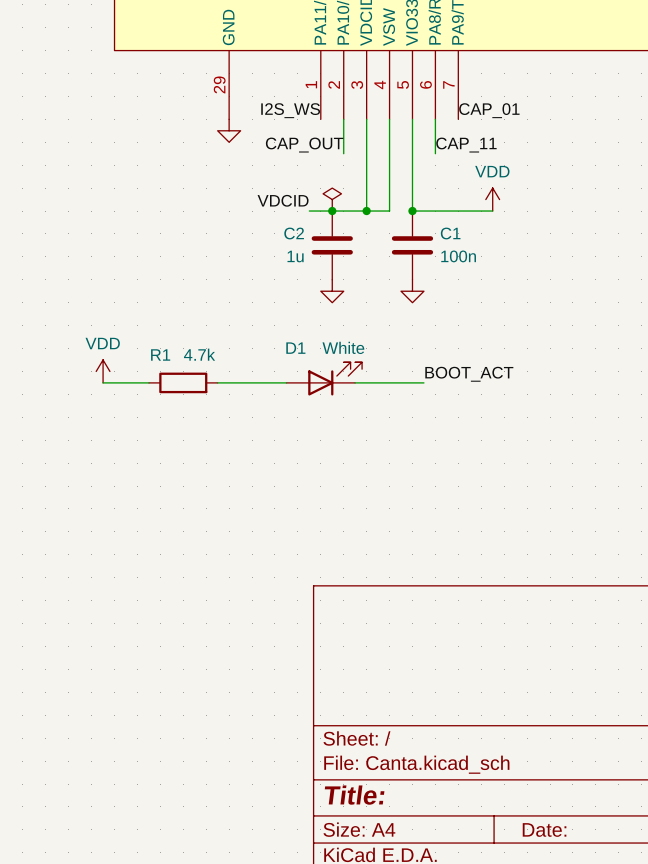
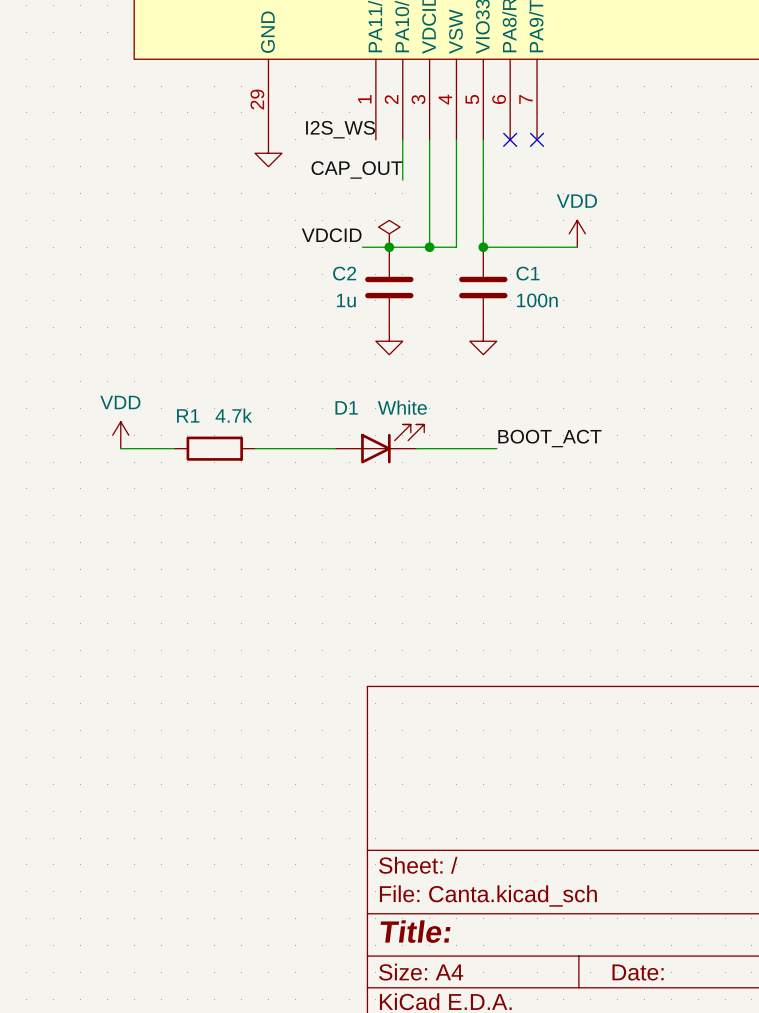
label: CAP_01 (489, 110) -> none
wire: (435, 119) (435, 153) -> none
no-connect mark: none -> (510, 139)
no-connect mark: none -> (537, 139)
label: CAP_11 (466, 145) -> none

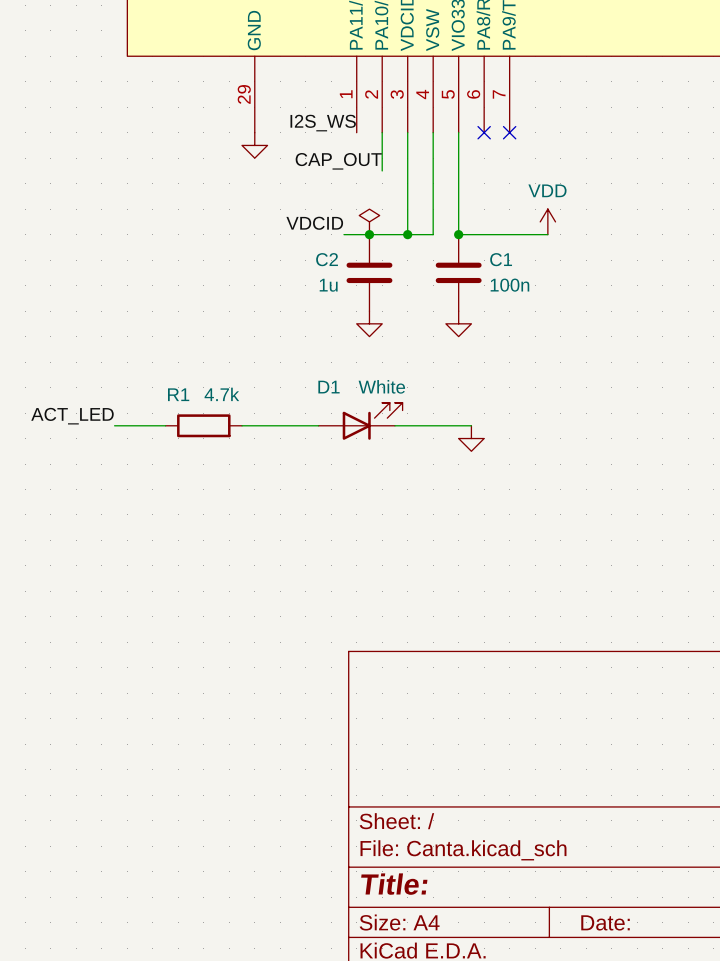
power symbol: VDD (120, 435) -> none
label: none -> ACT_LED (72, 416)
label: BOOT_ACT (549, 438) -> none
power symbol: none -> (471, 438)

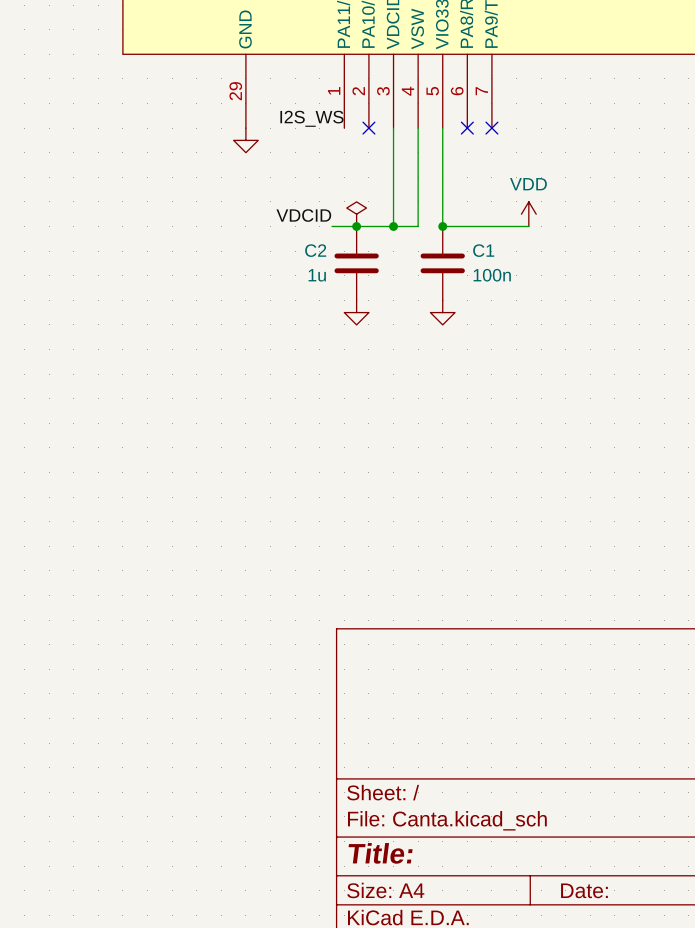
wire: (382, 132) (382, 170) -> none
no-connect mark: none -> (368, 128)
label: CAP_OUT (338, 161) -> none
label: ACT_LED (72, 416) -> none
D1: White (360, 421) -> none
wire: (114, 425) (165, 425) -> none
R1: 4.7k (203, 425) -> none
wire: (242, 425) (318, 425) -> none
wire: (394, 425) (471, 425) -> none
power symbol: (471, 438) -> none

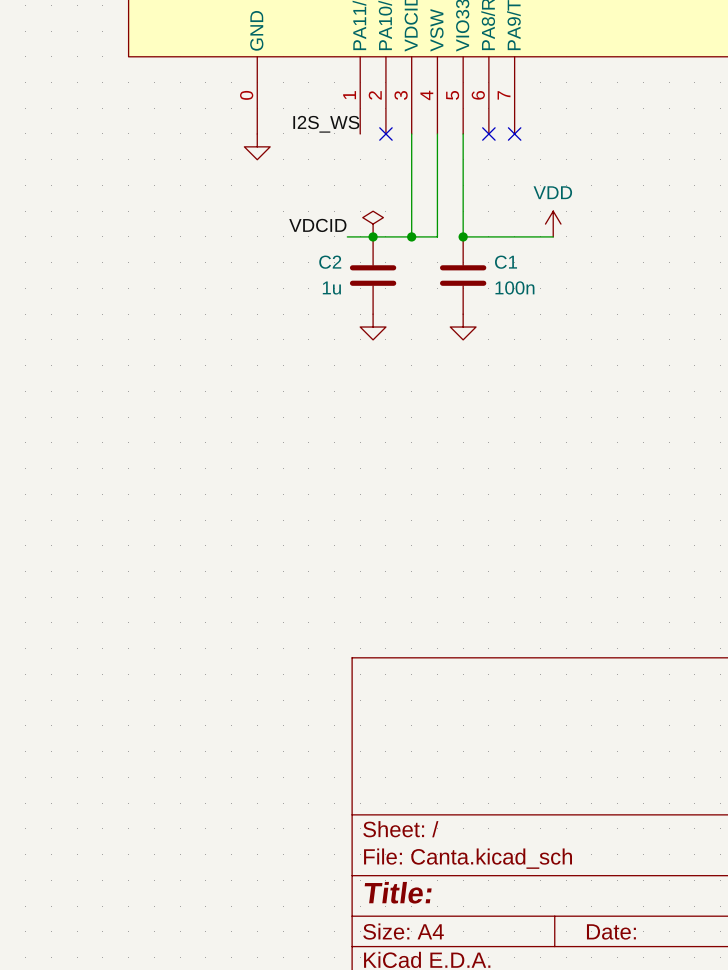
part pin number: 29 (235, 91) -> 0 (246, 95)

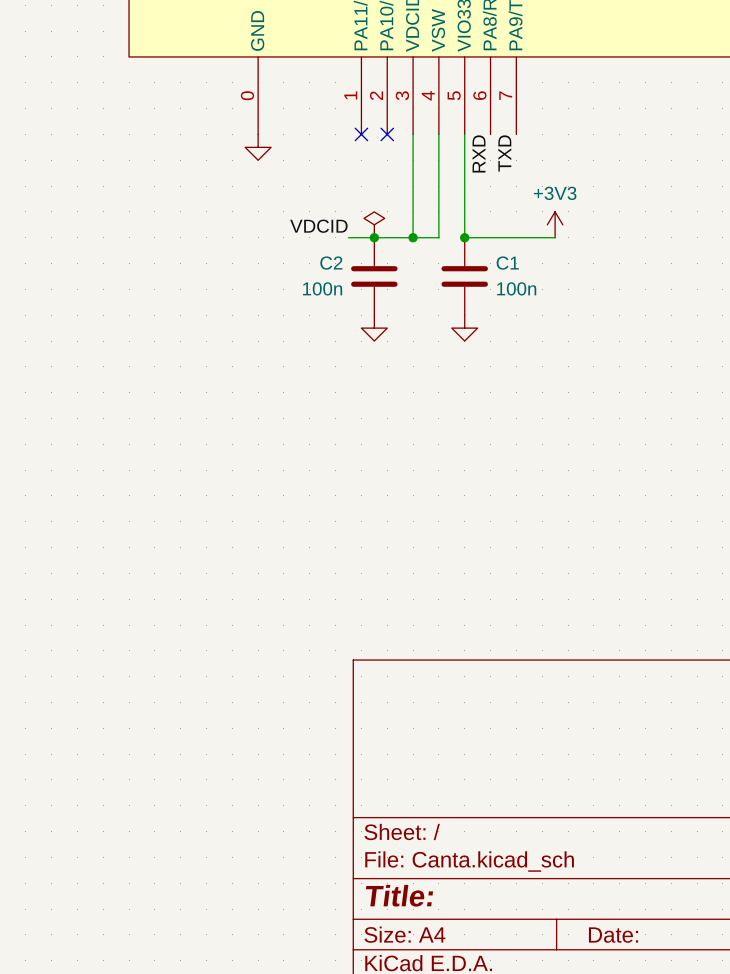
label: I2S_WS (326, 124) -> none
no-connect mark: none -> (361, 134)
no-connect mark: (488, 133) -> none
no-connect mark: (514, 133) -> none
label: none -> TXD (504, 153)
label: none -> RXD (479, 153)
power symbol: VDD (553, 224) -> +3V3 (555, 224)
C2 value: 1u (331, 288) -> 100n (322, 288)

